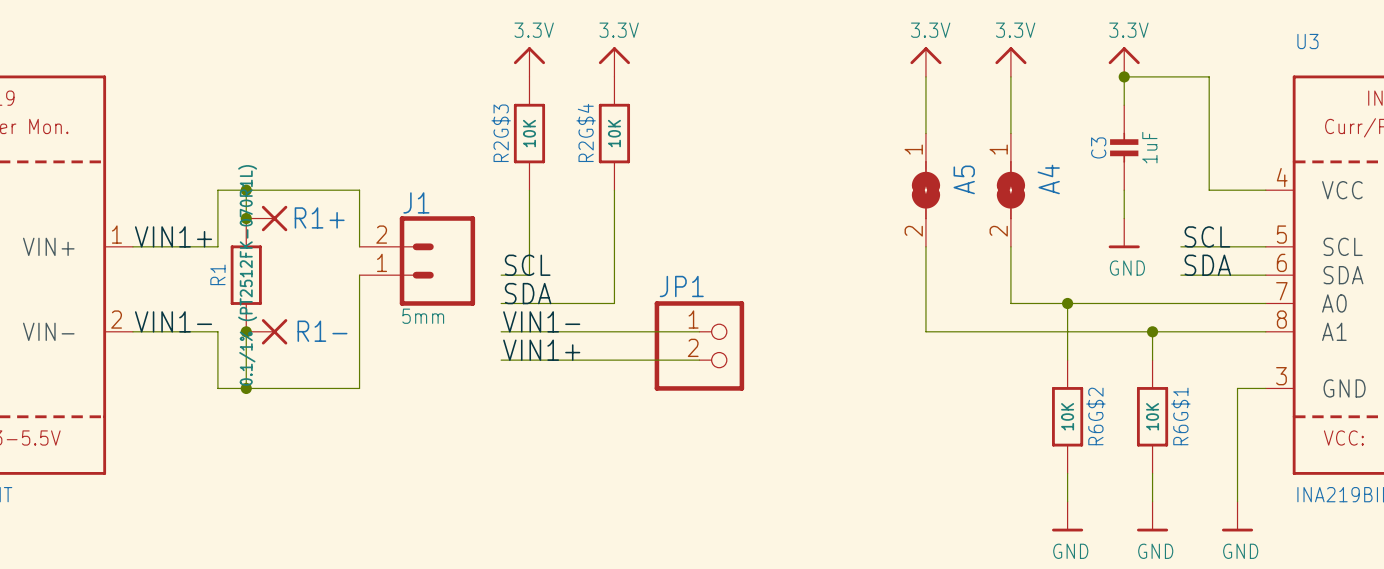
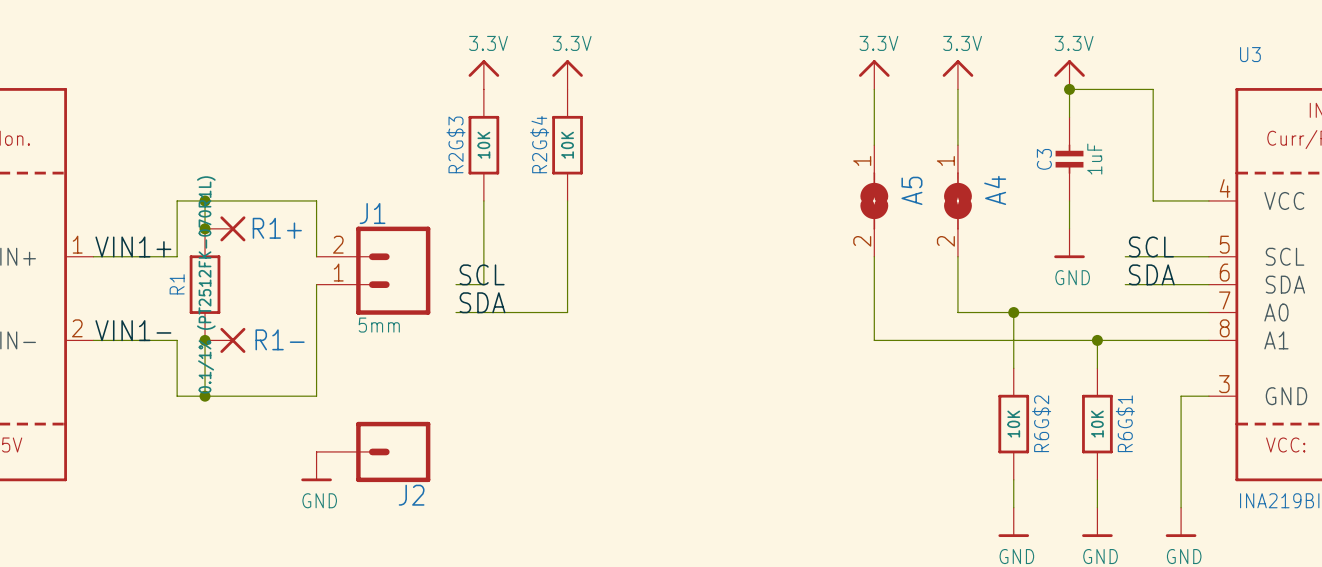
label: VIN1- (541, 321) -> none
wire: (501, 331) (699, 331) -> none
JP1: (699, 345) -> none
label: VIN1+ (541, 350) -> none
wire: (501, 360) (699, 360) -> none
J2: none -> (373, 451)
power symbol: none -> GND (316, 466)

